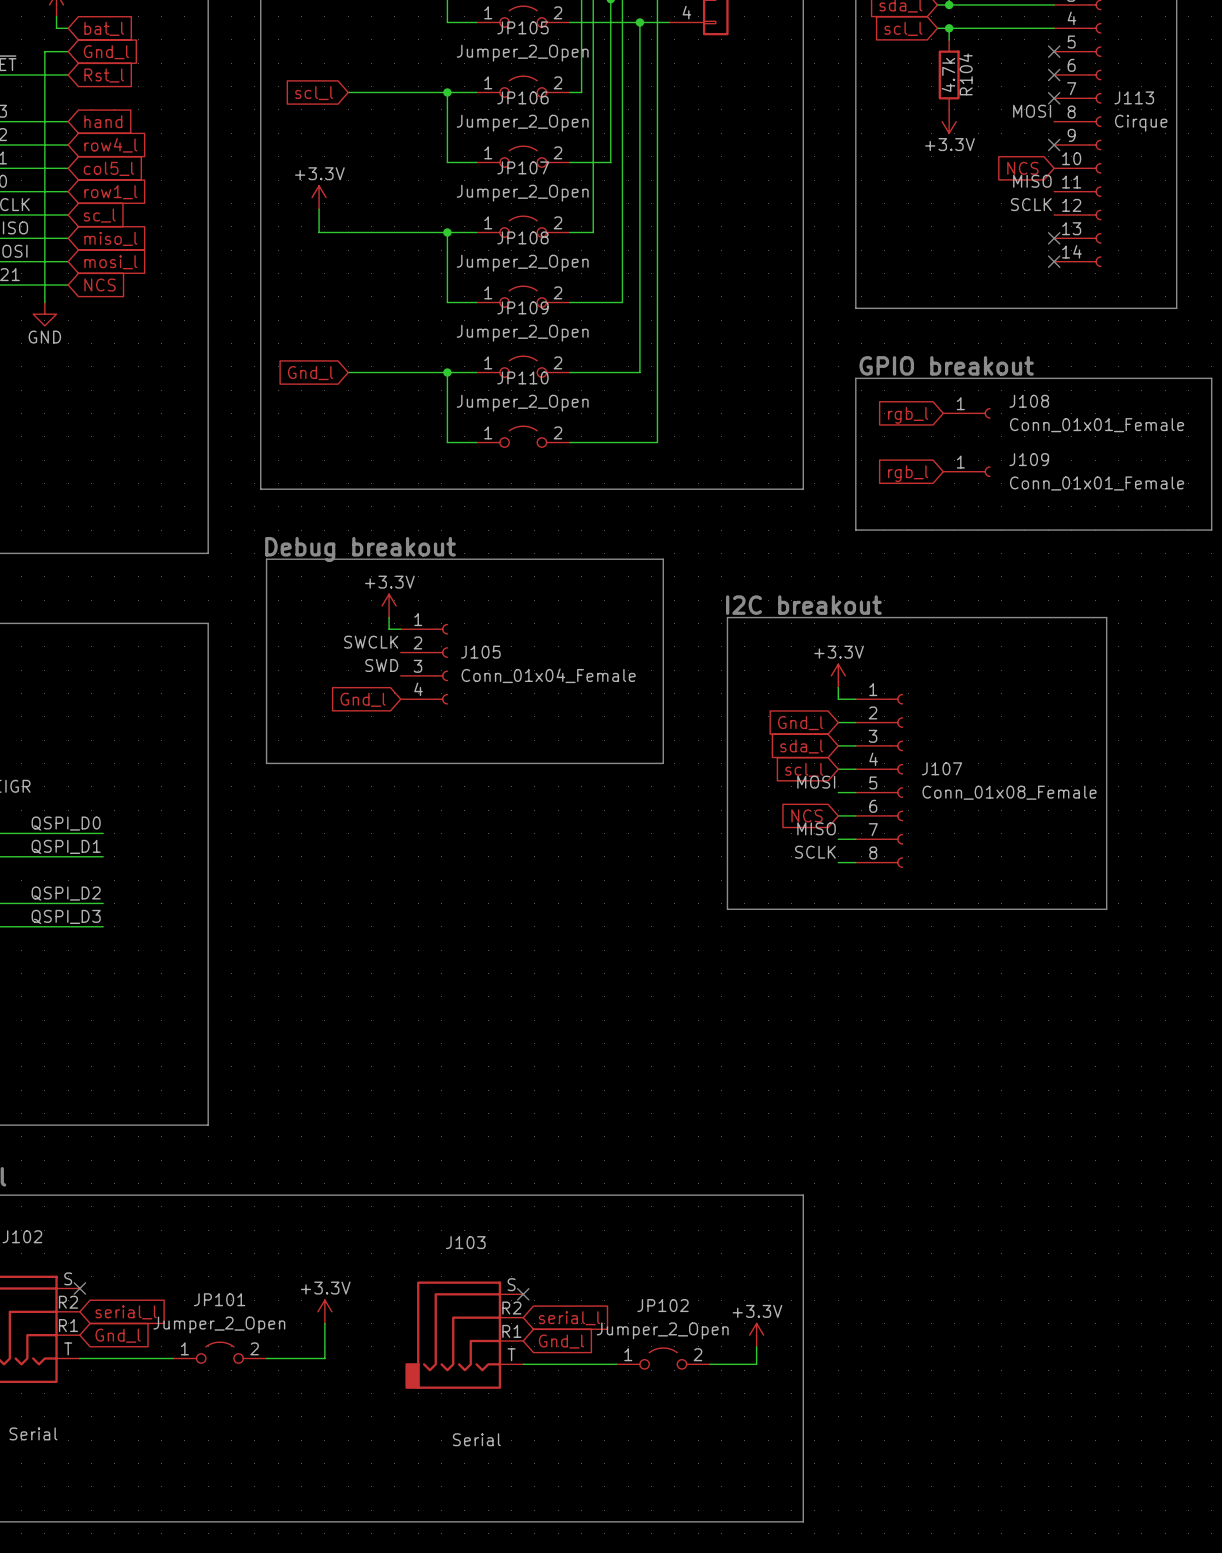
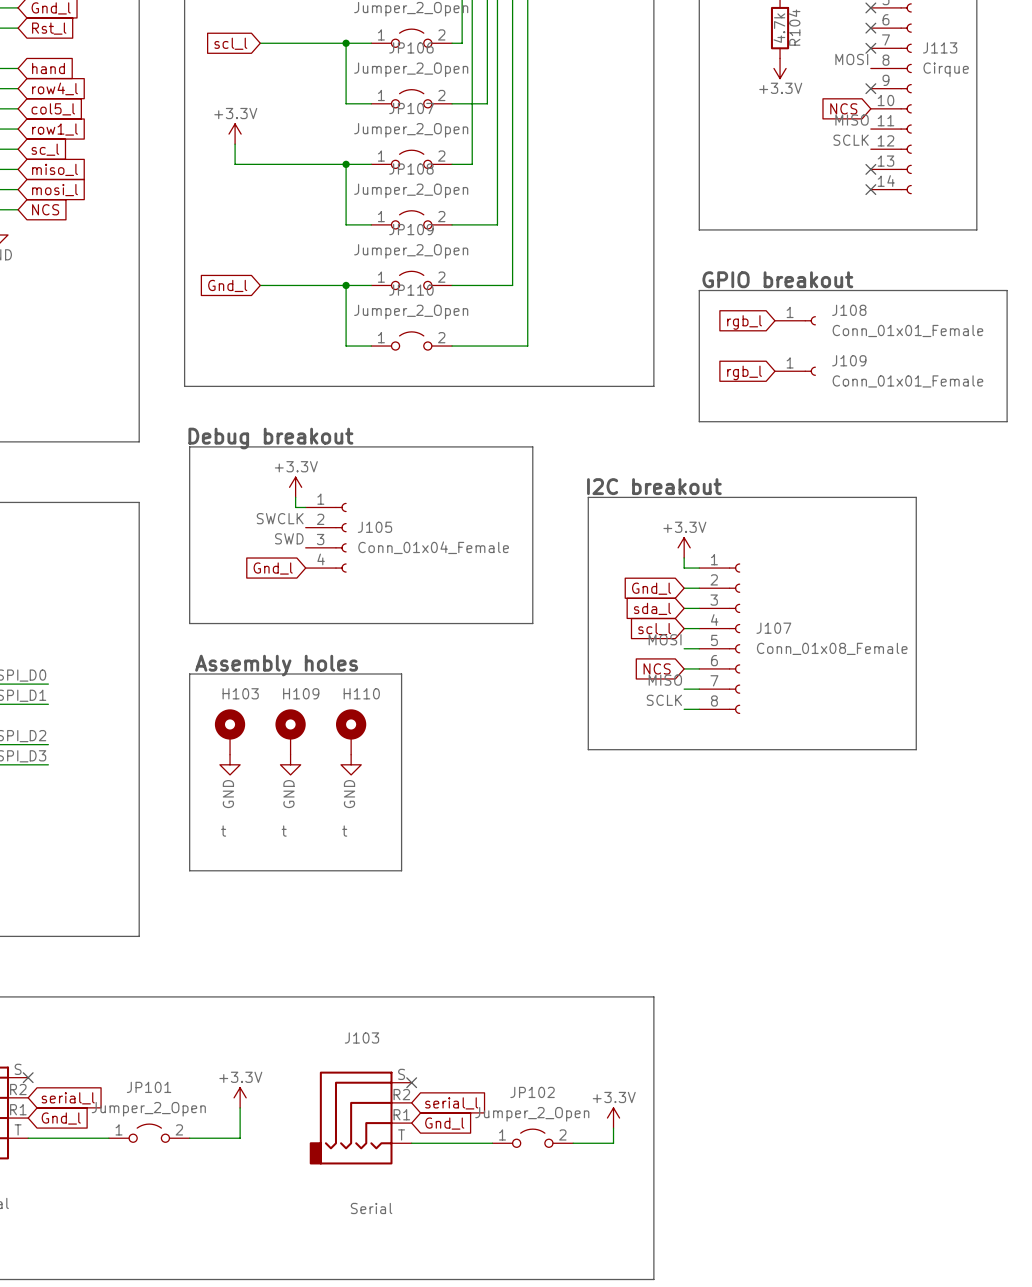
text: none -> Assembly holes (276, 665)
line: none -> (189, 674) (189, 870) (401, 870) (401, 674) (189, 674)
H103: none -> t (230, 732)
H109: none -> t (290, 732)
H110: none -> t (351, 732)
power symbol: none -> GND (230, 764)
power symbol: none -> GND (290, 764)
power symbol: none -> GND (351, 764)

